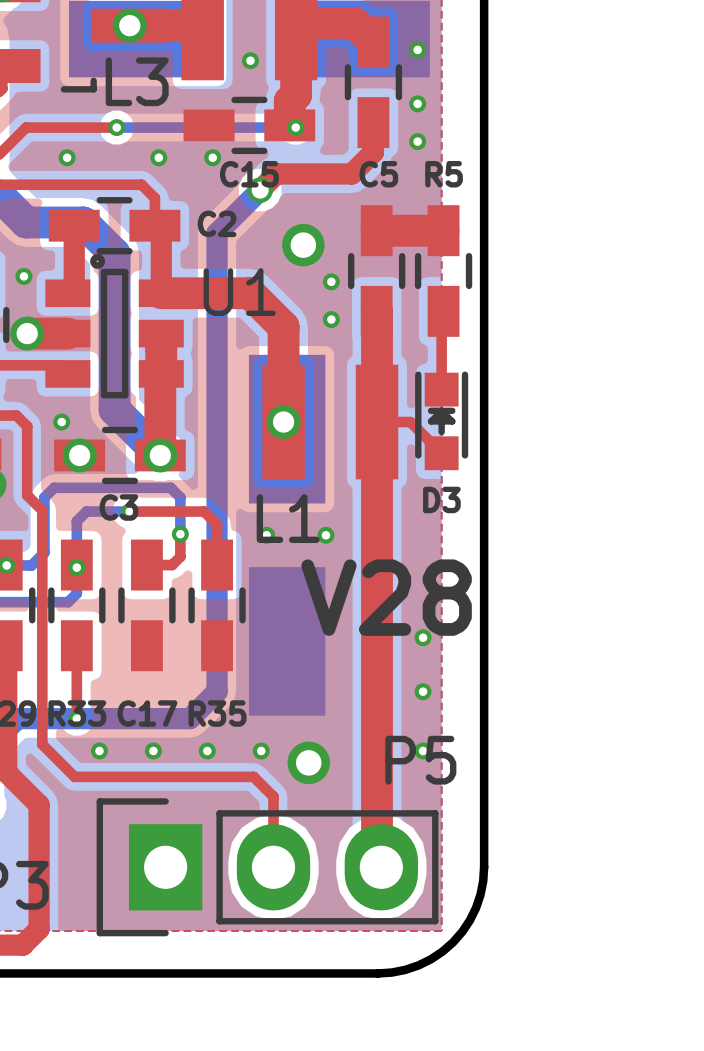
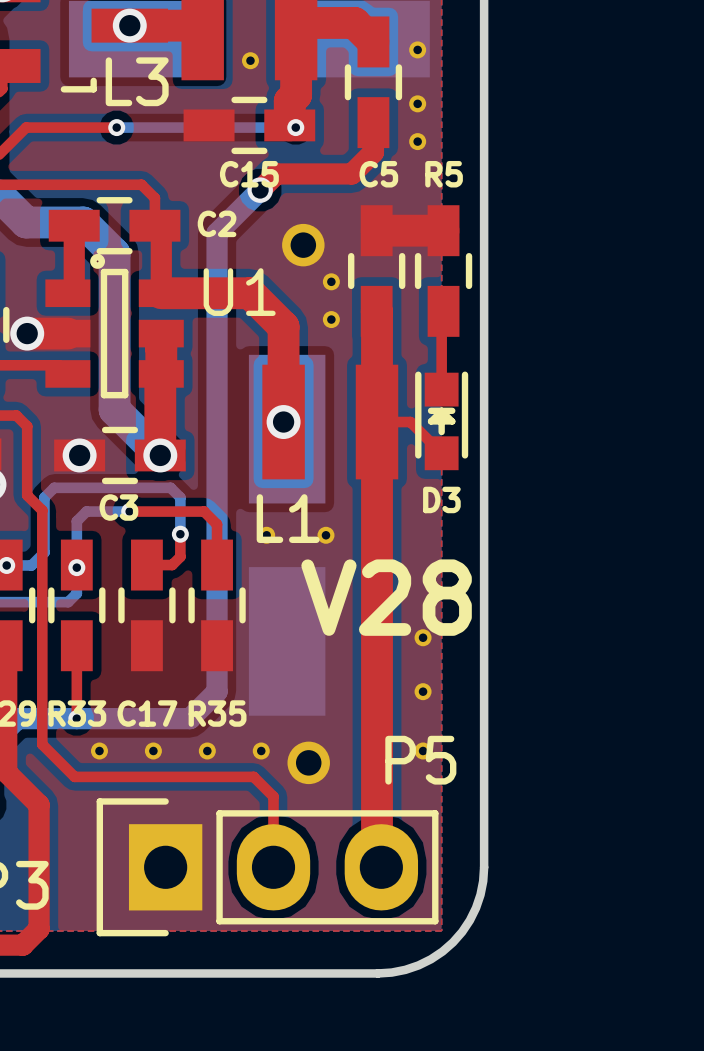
part: (67, 157) -> none
part: (158, 157) -> none
part: (212, 157) -> none
part: (23, 276) -> none
part: (61, 422) -> none

